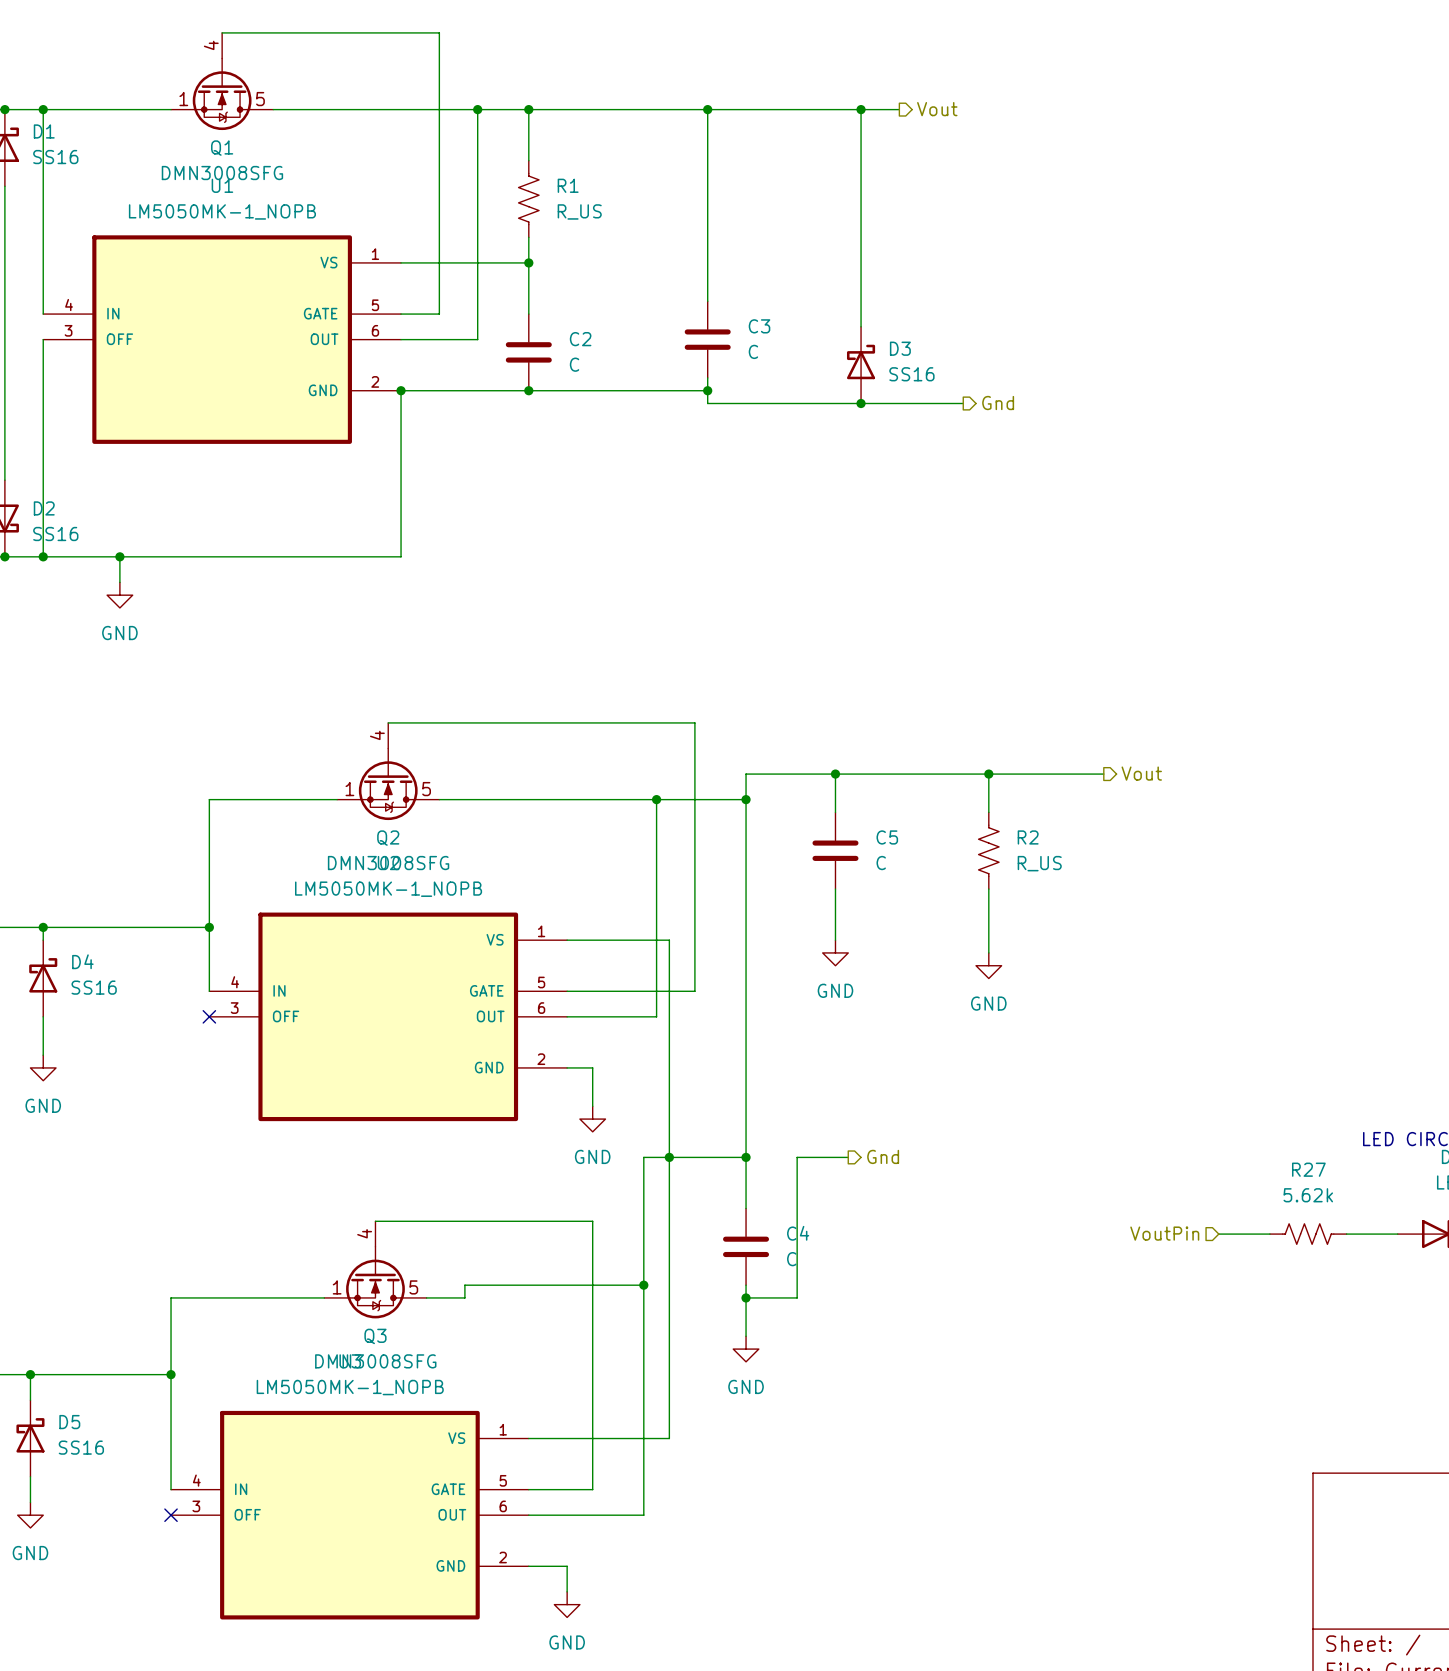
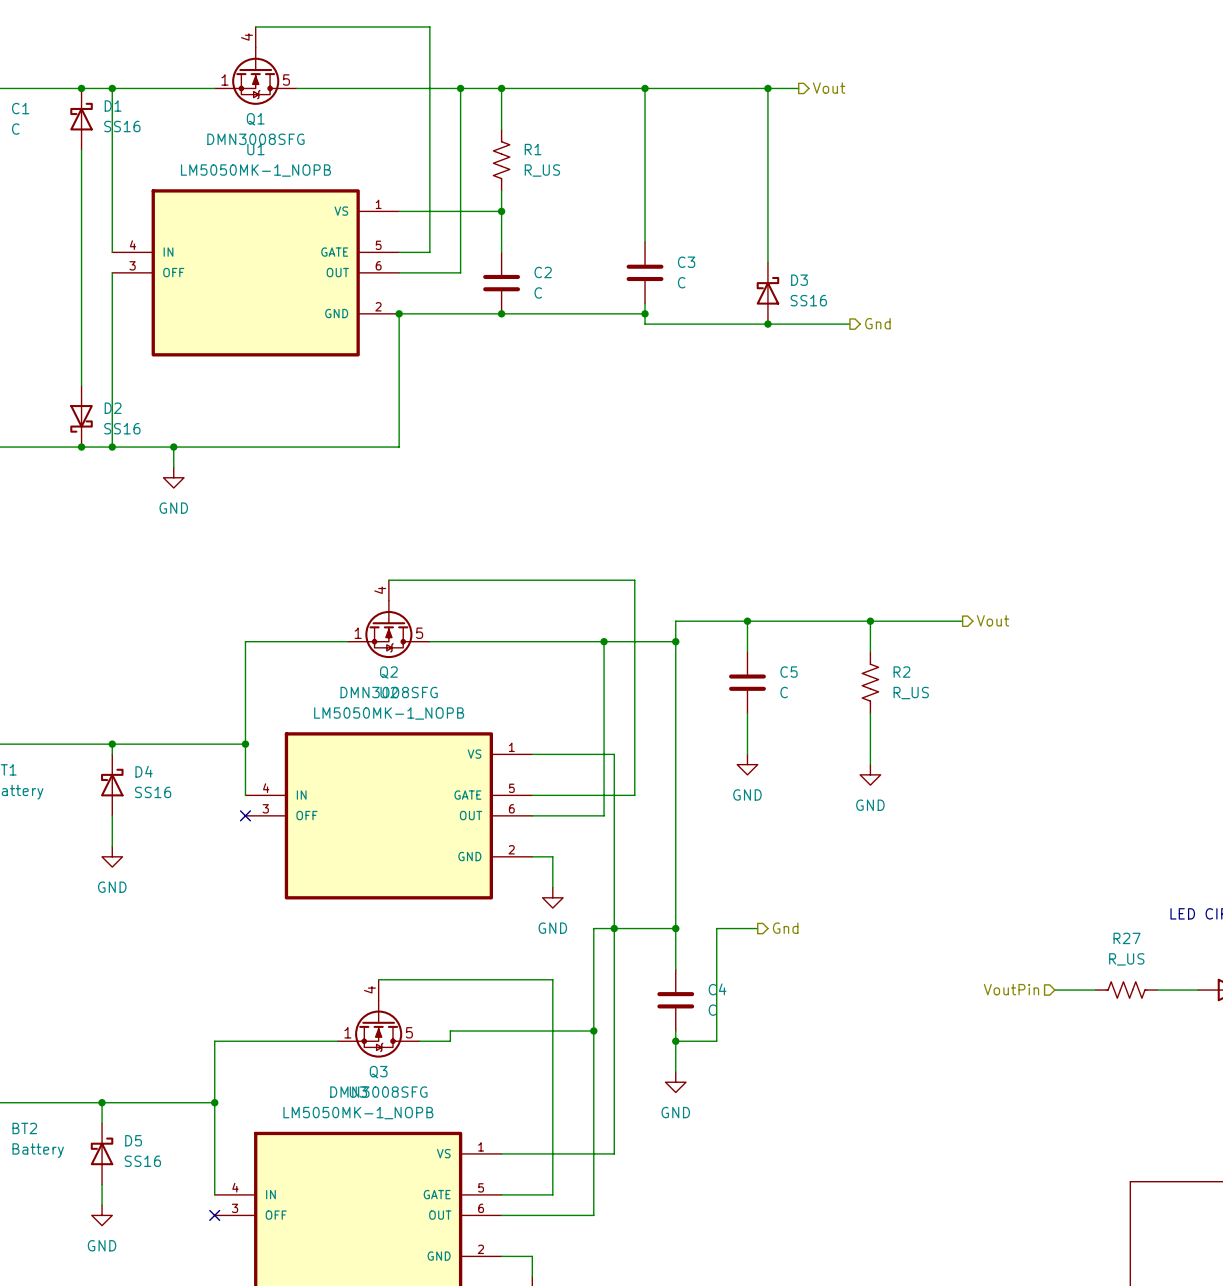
R27 value: 5.62k (1308, 1195) -> R_US (1126, 959)

